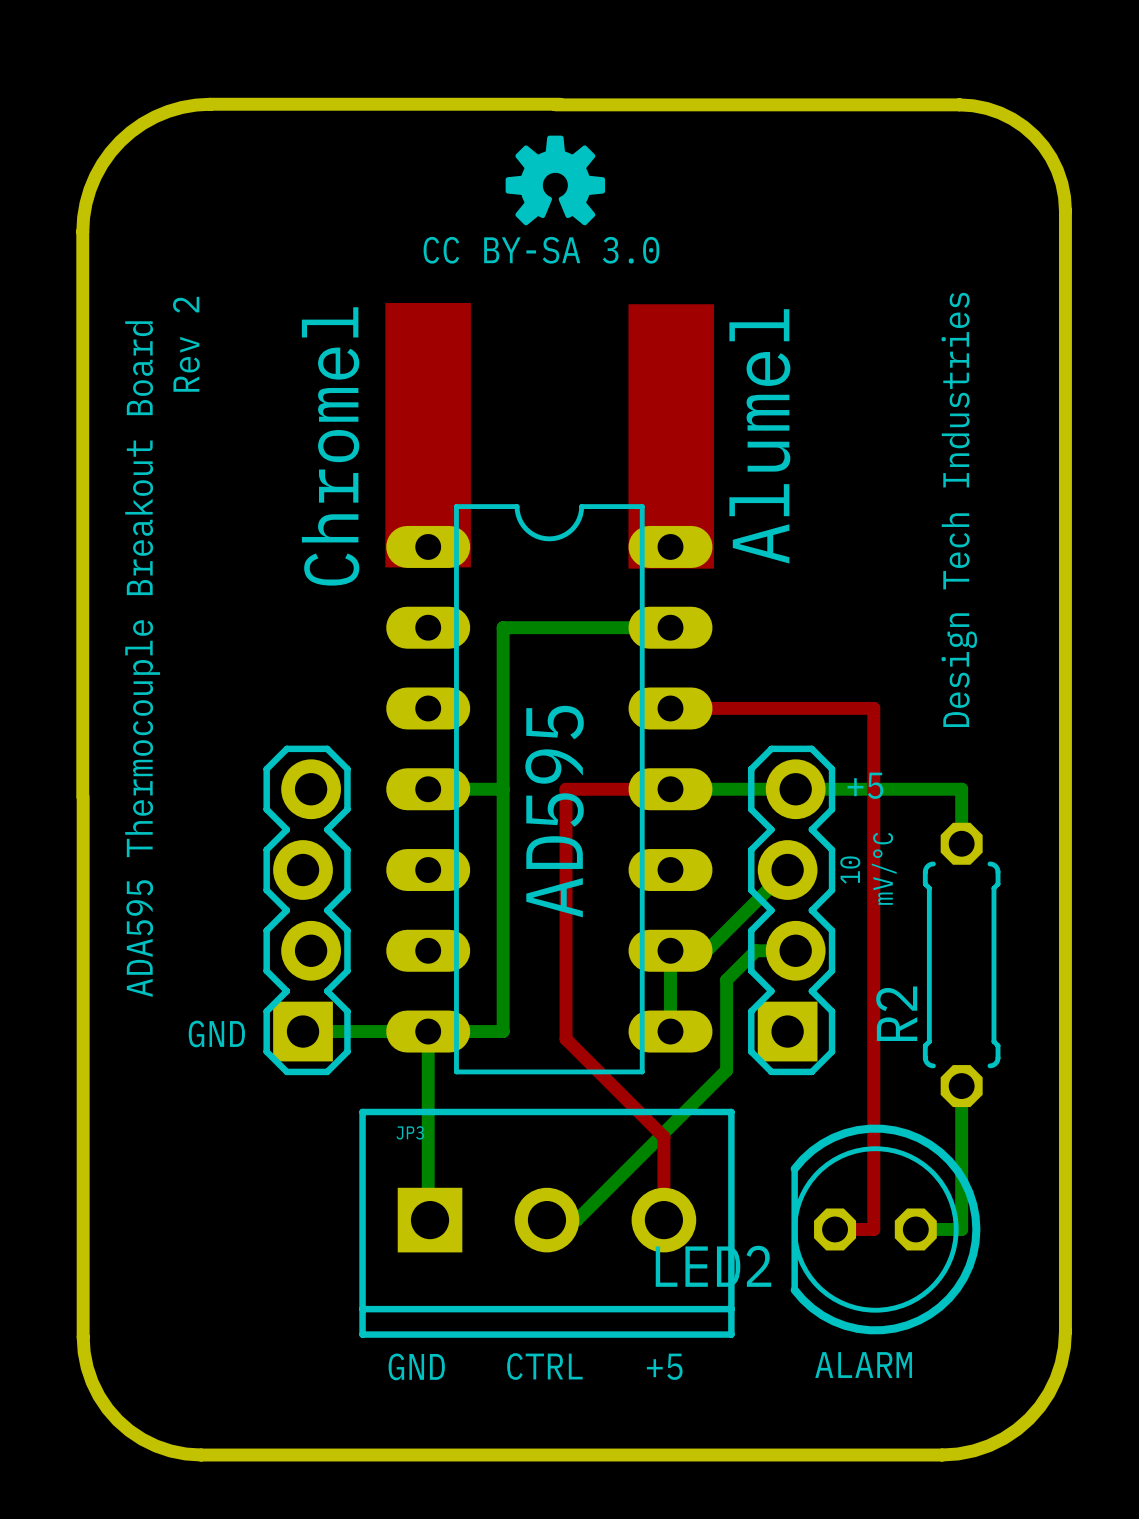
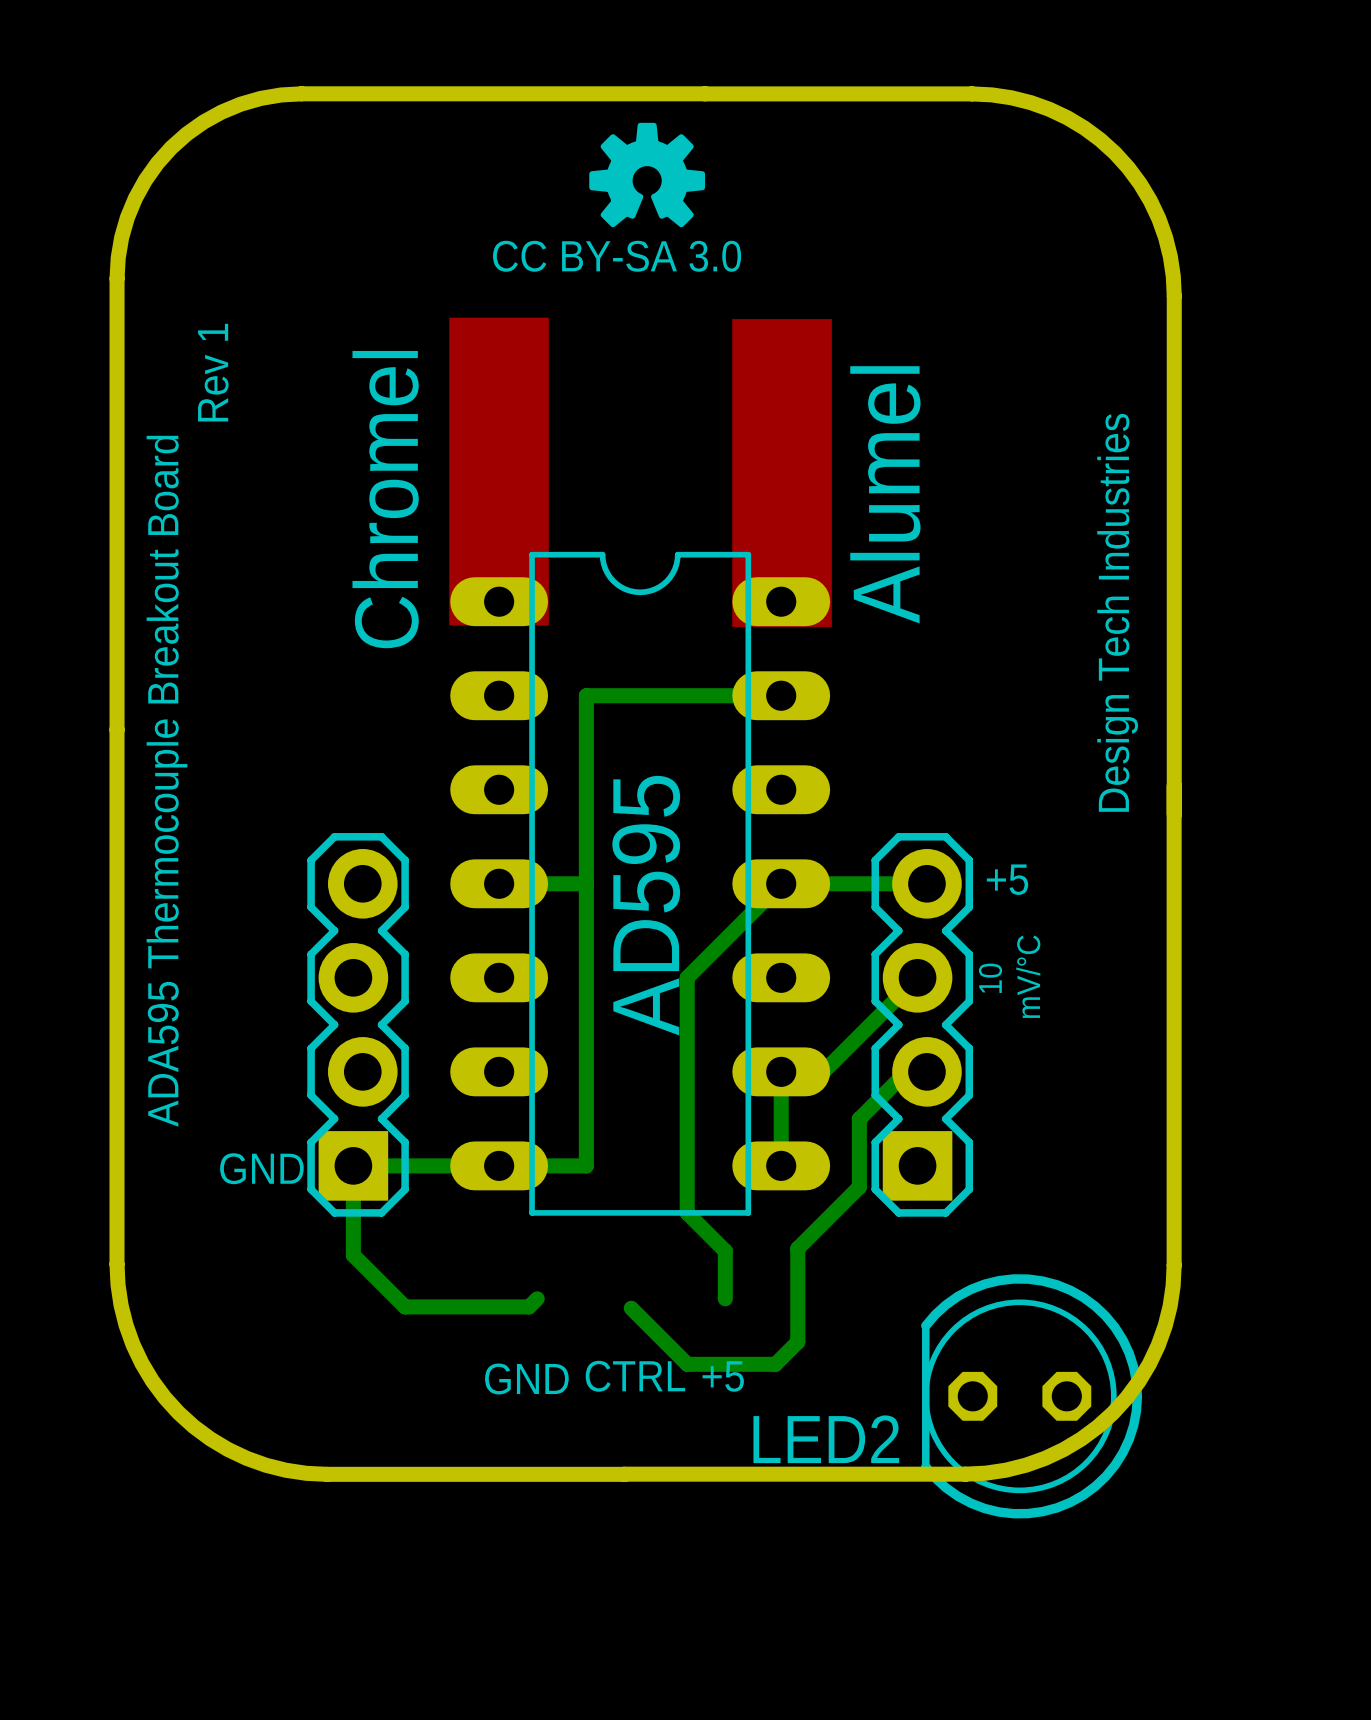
board edge: (555, 104) (973, 105) (1000, 112) (1023, 126) (1043, 146) (1057, 170) (1064, 197) (1065, 210) (1065, 1331) (1061, 1363) (1048, 1393) (1039, 1406) (1017, 1429) (989, 1445) (974, 1450) (942, 1455) (201, 1455) (170, 1451) (142, 1439) (129, 1430) (107, 1408) (92, 1382) (84, 1352) (83, 797) -> none
board edge: (560, 104) (196, 105) (168, 111) (142, 123) (120, 141) (102, 163) (89, 189) (85, 203) (82, 231) (82, 796) -> none
text: Rev 2 (186, 344) -> Rev 1 (213, 372)
board edge: none -> (1174, 785) (1173, 1285) (1165, 1326) (1149, 1363) (1138, 1381) (1112, 1413) (1081, 1438) (1063, 1449) (1025, 1465) (985, 1473) (965, 1474) (327, 1474) (306, 1473) (266, 1465) (228, 1449) (193, 1426) (164, 1397) (152, 1380) (132, 1344) (126, 1325) (118, 1284) (117, 278) (121, 237) (127, 217) (145, 180) (171, 147) (186, 134) (221, 112) (260, 98) (301, 93) (971, 93) (991, 94) (1030, 102) (1049, 109) (1084, 127) (1100, 139) (1128, 167) (1150, 200) (1165, 237) (1173, 276) (1174, 814)
top track: (670, 708) (873, 708) (873, 1229) (835, 1229) -> none
bottom track: none -> (781, 883) (687, 977) (687, 1212) (725, 1251) (725, 1298)
top track: (670, 789) (566, 789) (566, 1039) (663, 1137) (663, 1220) -> none
bottom track: (795, 789) (961, 789) (961, 843) -> none
bottom track: (778, 950) (755, 950) (726, 980) (726, 1070) (576, 1220) (546, 1220) -> (906, 1071) (859, 1119) (859, 1187) (797, 1248) (797, 1342) (775, 1364) (687, 1364) (631, 1308)
R2: (961, 964) -> none
bottom track: none -> (353, 1165) (353, 1255) (405, 1306) (529, 1306) (537, 1298)
bottom track: (428, 1031) (428, 1220) (430, 1220) -> none
bottom track: (961, 1086) (961, 1229) (915, 1229) -> none
JP3: (546, 1223) -> none
text: ALARM (863, 1365) -> none
text position: GND (416, 1366) -> GND (526, 1378)
text position: CTRL (544, 1366) -> CTRL (635, 1376)
text position: +5 (664, 1366) -> +5 (723, 1376)

